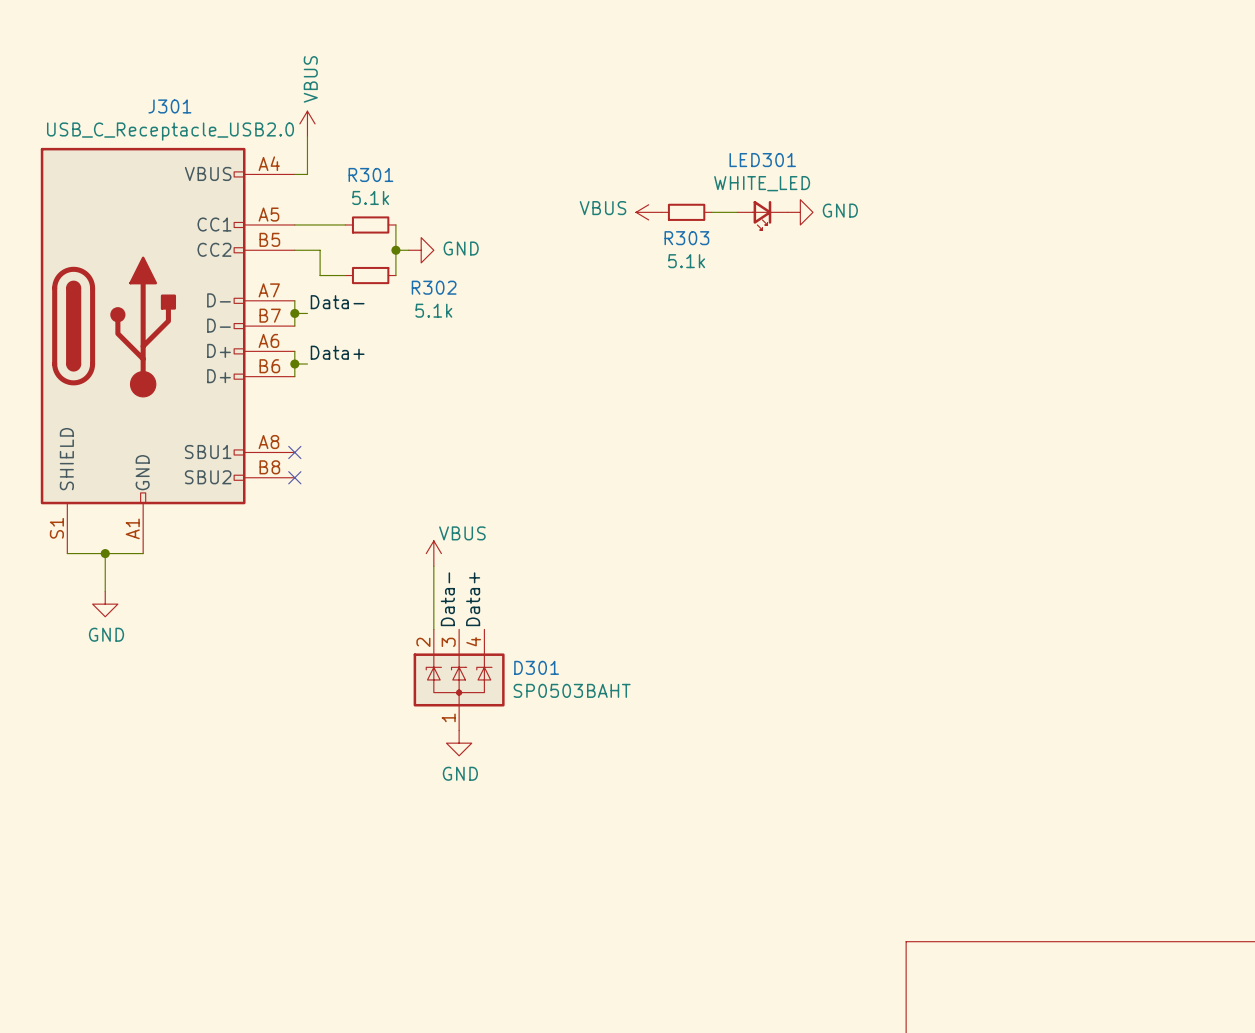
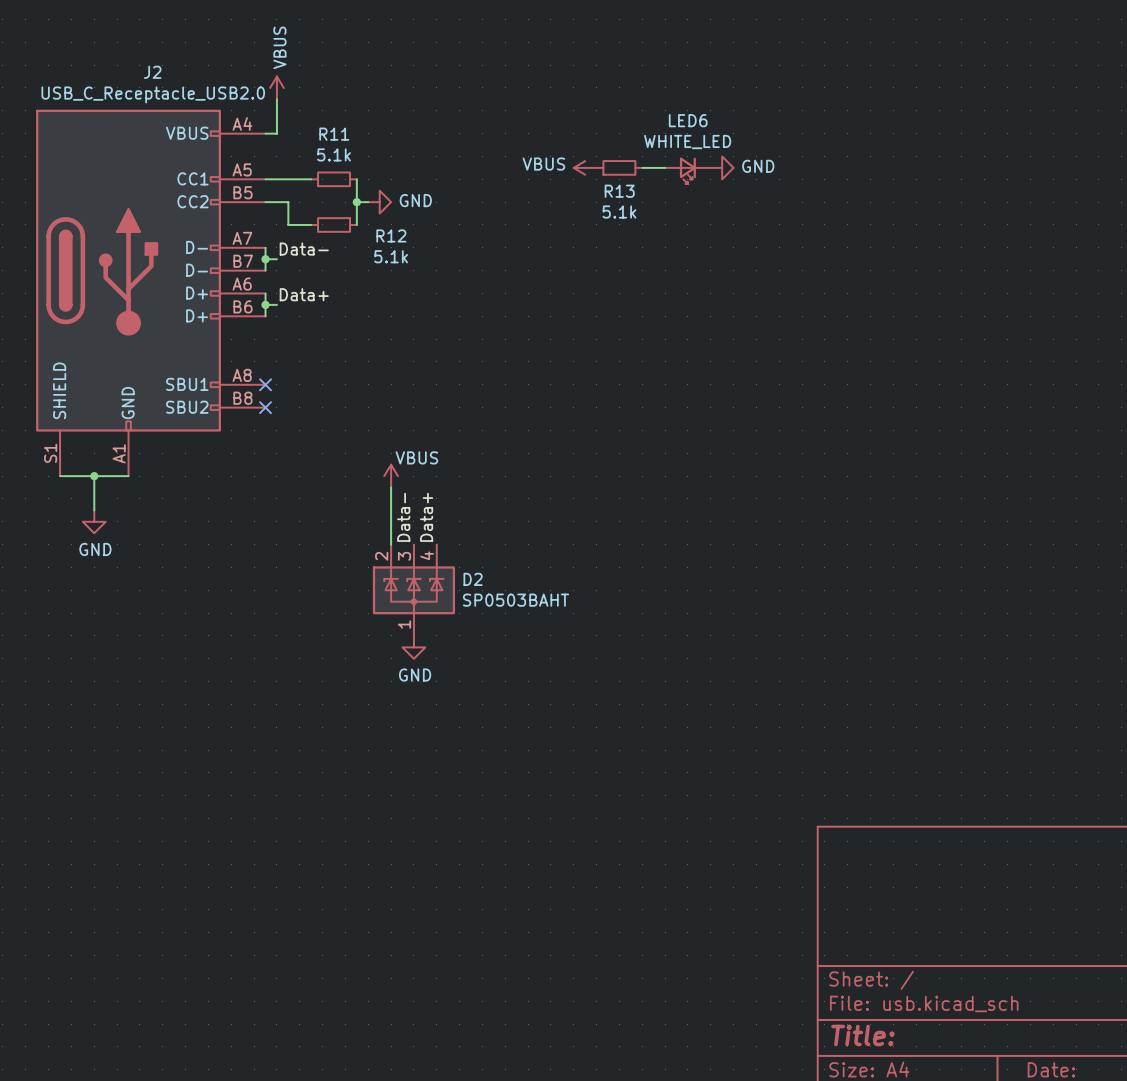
J301 name: J301 (169, 106) -> J2 (152, 72)
LED301 name: LED301 (762, 160) -> LED6 (688, 120)
R301 name: R301 (370, 174) -> R11 (334, 134)
R303 name: R303 (686, 238) -> R13 (619, 191)
R302 name: R302 (434, 287) -> R12 (391, 235)
D301 name: D301 (536, 667) -> D2 (473, 579)

